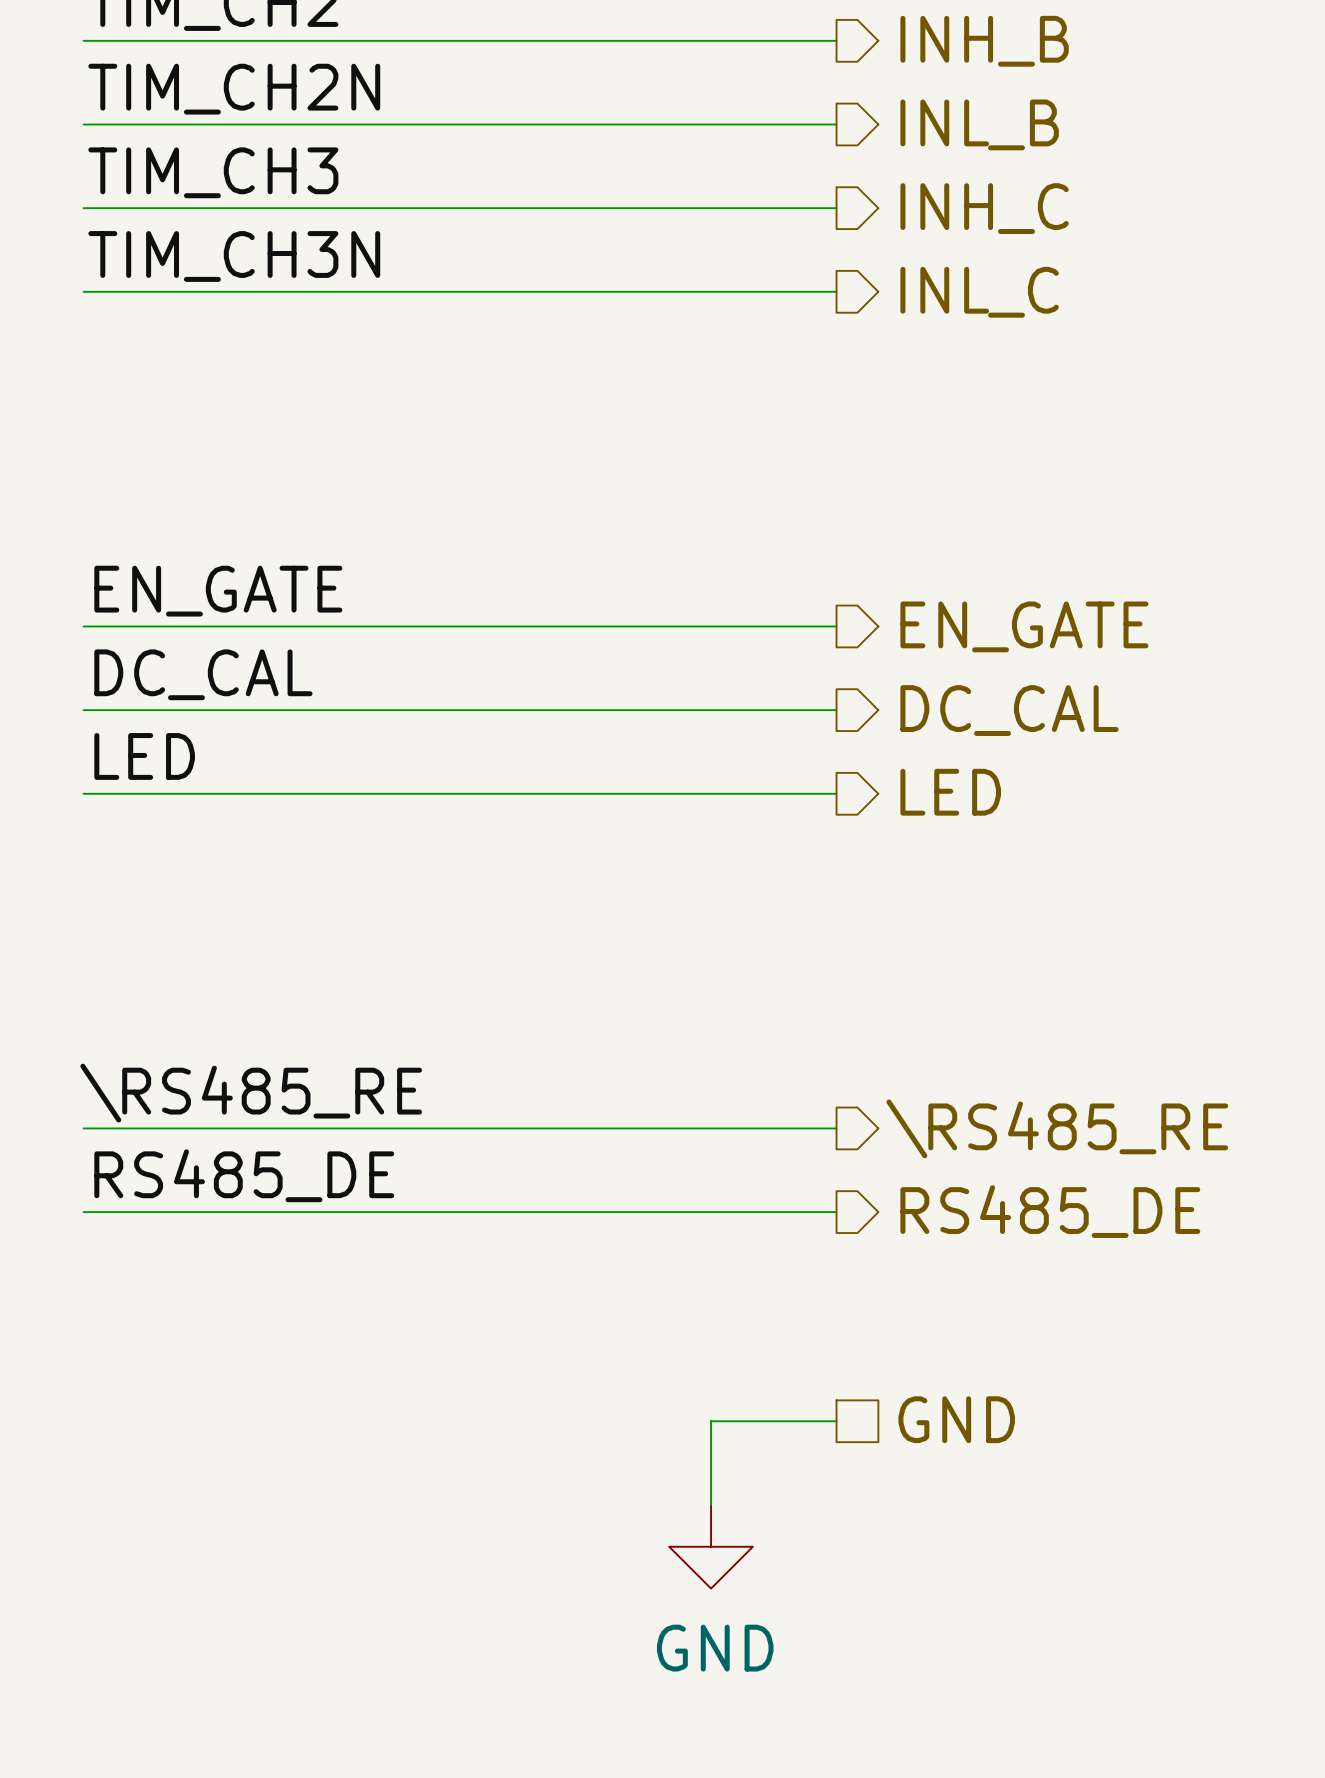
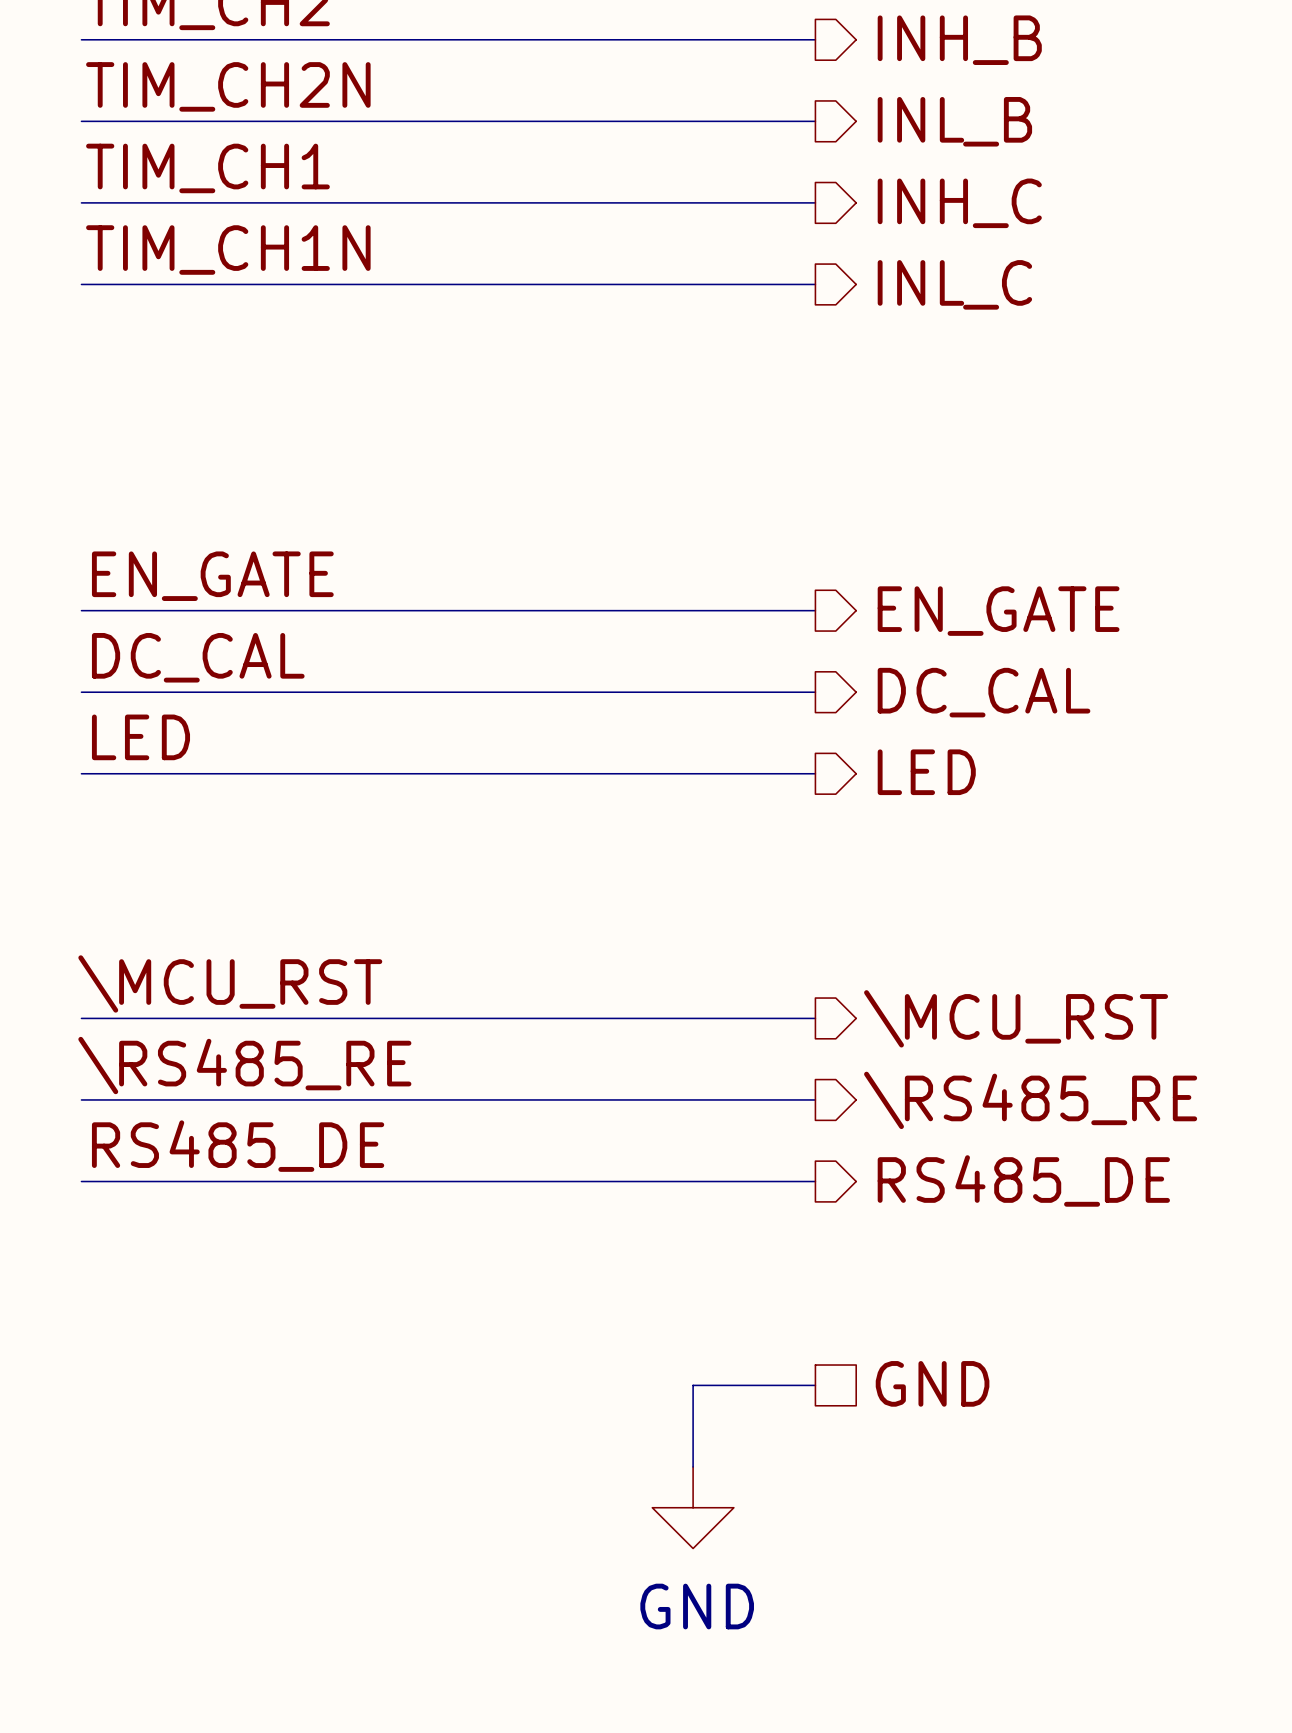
label: TIM_CH3 (213, 172) -> TIM_CH1 (207, 168)
label: TIM_CH3N (234, 256) -> TIM_CH1N (228, 250)
label: none -> \MCU_RST (230, 983)
wire: none -> (81, 1018) (815, 1018)
hierarchical label: none -> \MCU_RST (1016, 1018)

